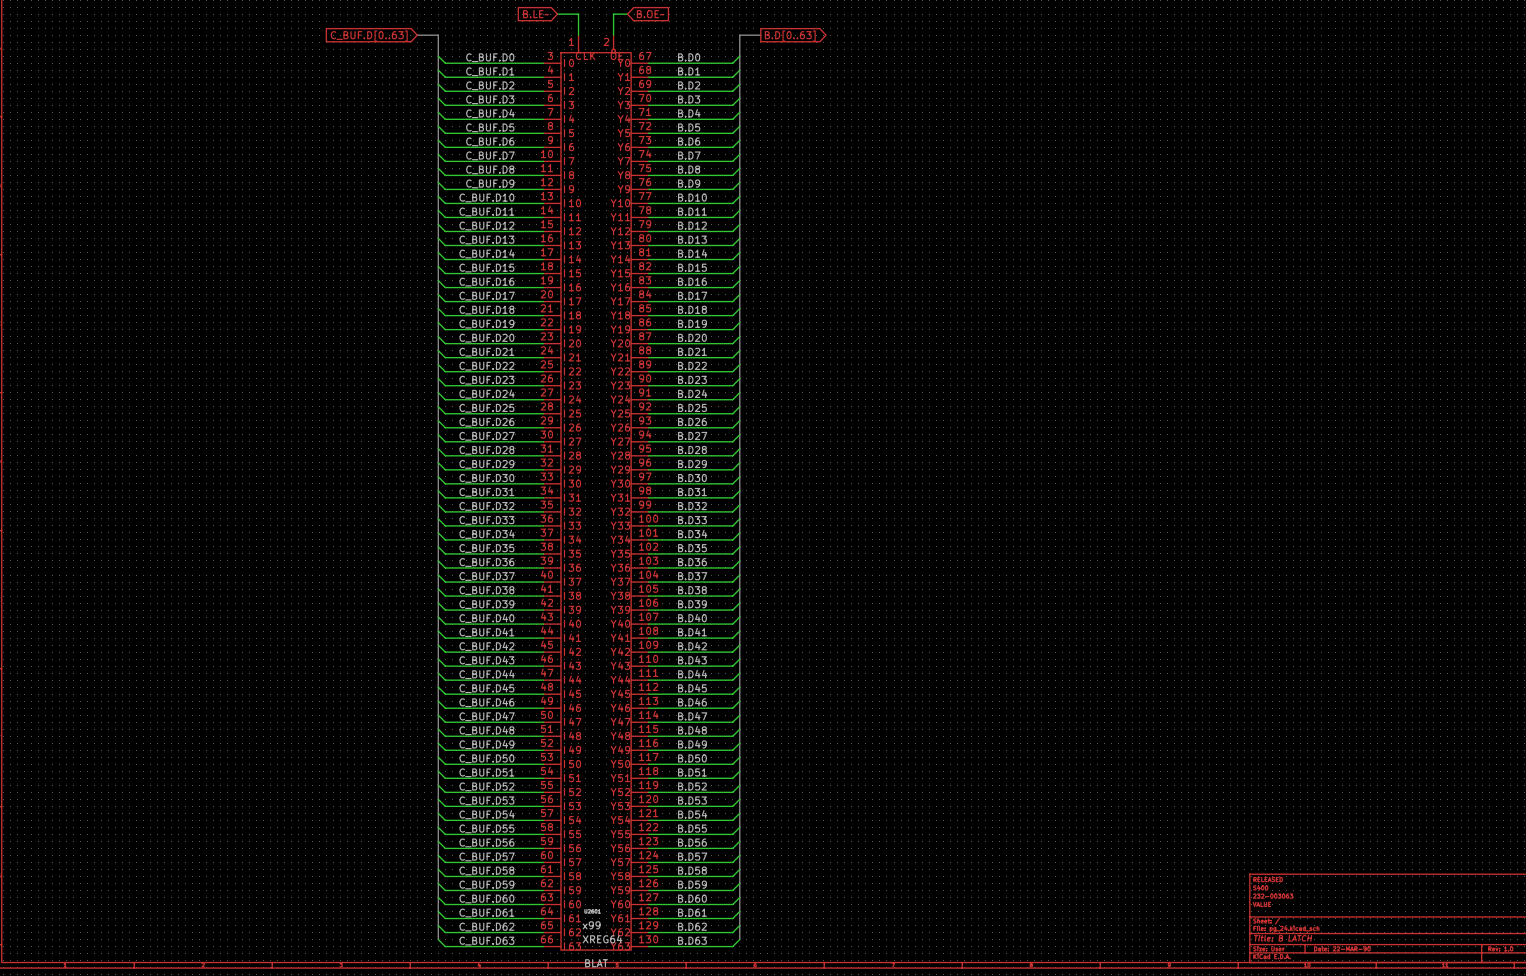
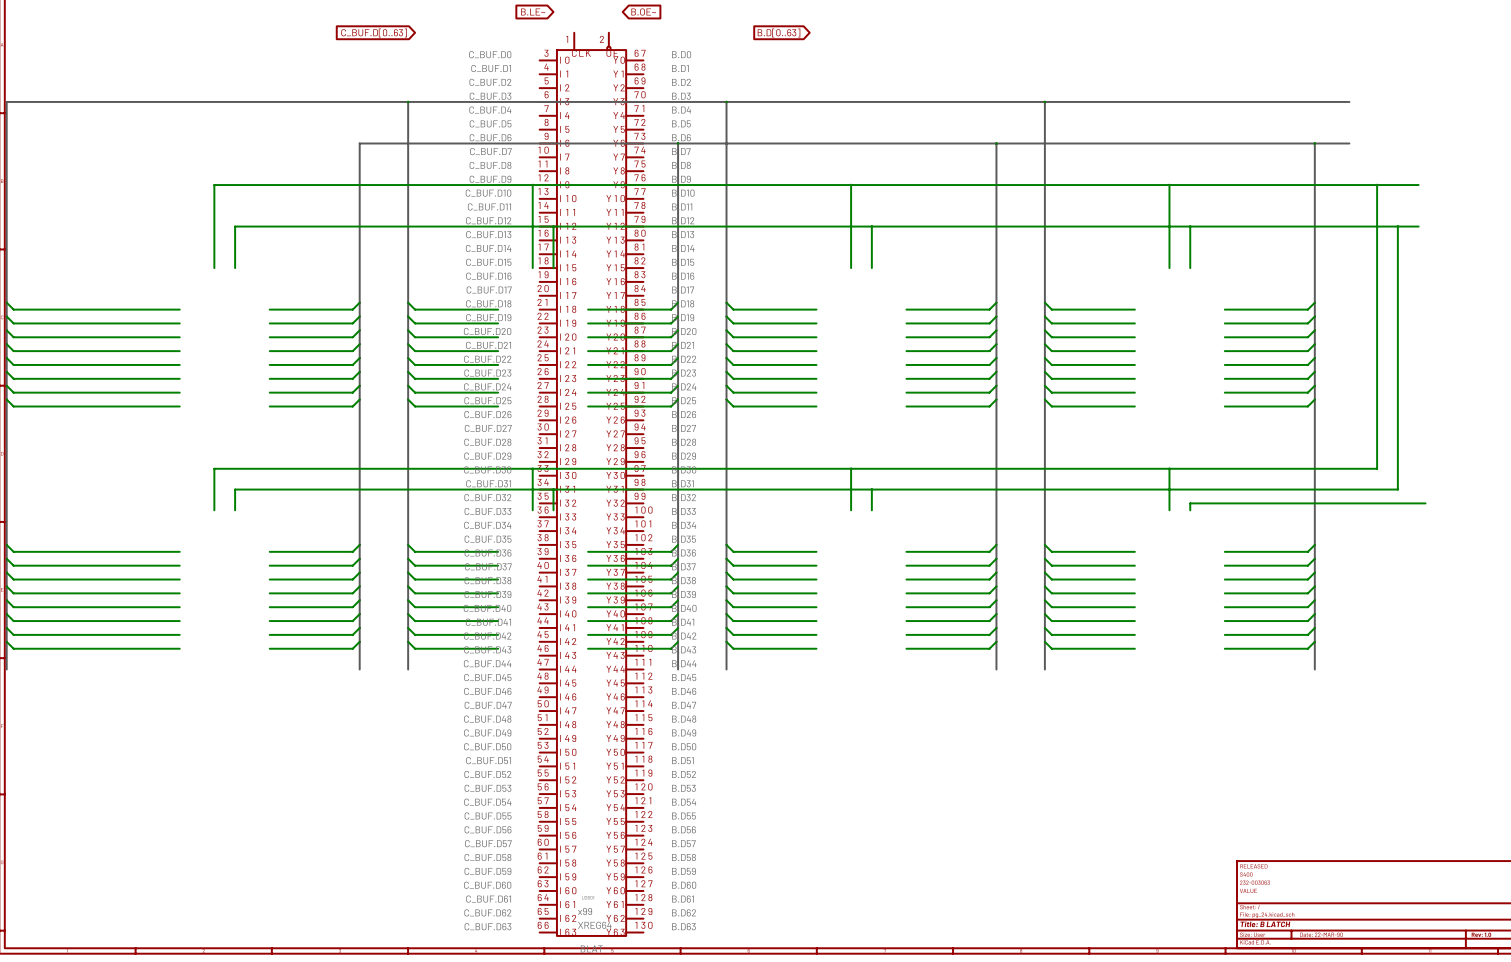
wire: (557, 14) (578, 14) (578, 35) -> none
wire: (627, 14) (613, 14) (613, 35) -> none
bus: (417, 35) (438, 35) (438, 939) -> none
bus: (760, 35) (739, 35) (739, 939) -> none
wire: (438, 56) (445, 63) (543, 63) -> none
wire: (739, 56) (732, 63) (648, 63) -> none
wire: (438, 70) (445, 77) (543, 77) -> none
wire: (739, 70) (732, 77) (648, 77) -> none
wire: (438, 84) (445, 91) (543, 91) -> none
wire: (739, 84) (732, 91) (648, 91) -> none
bus: none -> (408, 101) (408, 669)
junction: none -> (408, 101)
bus: none -> (726, 101) (726, 669)
junction: none -> (726, 101)
bus: none -> (1044, 101) (1044, 669)
junction: none -> (1044, 101)
bus: none -> (1349, 101) (6, 101) (6, 669)
wire: (438, 112) (445, 119) (543, 119) -> none
wire: (739, 112) (732, 119) (648, 119) -> none
wire: (438, 126) (445, 133) (543, 133) -> none
wire: (739, 126) (732, 133) (648, 133) -> none
bus: none -> (678, 143) (678, 669)
junction: none -> (678, 143)
bus: none -> (996, 143) (996, 669)
junction: none -> (996, 143)
bus: none -> (1314, 143) (1314, 669)
junction: none -> (1314, 143)
bus: none -> (1349, 143) (359, 143) (359, 669)
wire: (438, 154) (445, 161) (543, 161) -> none
wire: (739, 154) (732, 161) (648, 161) -> none
wire: (438, 168) (445, 175) (543, 175) -> none
wire: (739, 168) (732, 175) (648, 175) -> none
wire: (438, 182) (445, 189) -> (214, 268) (214, 185) (442, 185)
wire: (739, 182) (732, 189) -> (1418, 185) (726, 185)
wire: none -> (532, 185) (532, 268)
wire: none -> (539, 185) (643, 185)
wire: none -> (851, 185) (851, 268)
wire: none -> (1169, 185) (1169, 268)
wire: none -> (1377, 185) (1377, 468) (214, 468) (214, 510)
wire: (438, 196) (445, 203) (543, 203) -> none
wire: (739, 196) (732, 203) (648, 203) -> none
wire: (438, 210) (445, 217) (543, 217) -> none
wire: (739, 210) (732, 217) (648, 217) -> none
wire: (438, 224) (445, 231) -> (235, 268) (235, 226) (442, 226)
wire: (739, 224) (732, 231) -> (1418, 226) (726, 226)
wire: none -> (539, 226) (643, 226)
wire: none -> (553, 226) (553, 268)
wire: none -> (871, 226) (871, 268)
wire: none -> (1190, 226) (1190, 268)
wire: (438, 238) (445, 245) (543, 245) -> none
wire: (739, 238) (732, 245) (648, 245) -> none
wire: (438, 252) (445, 259) (543, 259) -> none
wire: (739, 252) (732, 259) (648, 259) -> none
wire: (438, 266) (445, 273) (543, 273) -> none
wire: (739, 266) (732, 273) (648, 273) -> none
wire: (438, 280) (445, 287) (543, 287) -> none
wire: (739, 280) (732, 287) (648, 287) -> none
wire: (438, 294) (445, 301) (543, 301) -> none
wire: (739, 294) (732, 301) (648, 301) -> none
wire: none -> (6, 302) (13, 309) (179, 309)
wire: none -> (359, 302) (352, 309) (269, 309)
wire: (438, 308) (445, 315) -> (408, 302) (415, 309) (442, 309)
wire: none -> (726, 302) (733, 309) (816, 309)
wire: (739, 308) (732, 315) (676, 315) -> (678, 302) (671, 309)
wire: none -> (996, 302) (989, 309) (906, 309)
wire: none -> (1044, 302) (1051, 309) (1134, 309)
wire: none -> (1314, 302) (1307, 309) (1224, 309)
wire: (501, 315) (543, 315) -> none
wire: none -> (588, 309) (643, 309)
wire: none -> (6, 316) (13, 323) (179, 323)
wire: none -> (359, 316) (352, 323) (269, 323)
wire: (438, 322) (445, 329) -> (408, 316) (415, 323) (442, 323)
wire: none -> (726, 316) (733, 323) (816, 323)
wire: (739, 322) (732, 329) (676, 329) -> (678, 316) (671, 323)
wire: none -> (996, 316) (989, 323) (906, 323)
wire: none -> (1044, 316) (1051, 323) (1134, 323)
wire: none -> (1314, 316) (1307, 323) (1224, 323)
wire: (501, 329) (543, 329) -> none
wire: none -> (588, 323) (643, 323)
wire: none -> (6, 330) (13, 337) (179, 337)
wire: none -> (359, 330) (352, 337) (269, 337)
wire: (438, 336) (445, 343) -> (408, 330) (415, 337) (442, 337)
wire: none -> (726, 330) (733, 337) (816, 337)
wire: (739, 336) (732, 343) (676, 343) -> (678, 330) (671, 337)
wire: none -> (996, 330) (989, 337) (906, 337)
wire: none -> (1044, 330) (1051, 337) (1134, 337)
wire: none -> (1314, 330) (1307, 337) (1224, 337)
wire: (501, 343) (543, 343) -> none
wire: none -> (588, 337) (643, 337)
wire: none -> (6, 344) (13, 351) (179, 351)
wire: none -> (359, 344) (352, 351) (269, 351)
wire: (438, 350) (445, 357) -> (408, 344) (415, 351) (442, 351)
wire: none -> (726, 344) (733, 351) (816, 351)
wire: (739, 350) (732, 357) (676, 357) -> (678, 344) (671, 351)
wire: none -> (996, 344) (989, 351) (906, 351)
wire: none -> (1044, 344) (1051, 351) (1134, 351)
wire: none -> (1314, 344) (1307, 351) (1224, 351)
wire: (501, 357) (543, 357) -> none
wire: none -> (588, 351) (643, 351)
wire: none -> (6, 358) (13, 364) (179, 364)
wire: none -> (359, 358) (352, 364) (269, 364)
wire: (438, 364) (445, 371) -> (408, 358) (415, 364) (442, 364)
wire: none -> (726, 358) (733, 364) (816, 364)
wire: (739, 364) (732, 371) (676, 371) -> (678, 358) (671, 364)
wire: none -> (996, 358) (989, 364) (906, 364)
wire: none -> (1044, 358) (1051, 364) (1134, 364)
wire: none -> (1314, 358) (1307, 364) (1224, 364)
wire: (501, 371) (543, 371) -> none
wire: none -> (588, 364) (643, 364)
wire: none -> (6, 371) (13, 378) (179, 378)
wire: none -> (359, 371) (352, 378) (269, 378)
wire: (438, 378) (445, 385) -> (408, 371) (415, 378) (442, 378)
wire: none -> (726, 371) (733, 378) (816, 378)
wire: (739, 378) (732, 385) (676, 385) -> (678, 371) (671, 378)
wire: none -> (996, 371) (989, 378) (906, 378)
wire: none -> (1044, 371) (1051, 378) (1134, 378)
wire: none -> (1314, 371) (1307, 378) (1224, 378)
wire: (501, 385) (543, 385) -> none
wire: none -> (588, 378) (643, 378)
wire: none -> (6, 385) (13, 392) (179, 392)
wire: none -> (359, 385) (352, 392) (269, 392)
wire: (438, 392) (445, 399) -> (408, 385) (415, 392) (442, 392)
wire: none -> (726, 385) (733, 392) (816, 392)
wire: (739, 392) (732, 399) (676, 399) -> (678, 385) (671, 392)
wire: none -> (996, 385) (989, 392) (906, 392)
wire: none -> (1044, 385) (1051, 392) (1134, 392)
wire: none -> (1314, 385) (1307, 392) (1224, 392)
wire: (501, 399) (543, 399) -> none
wire: none -> (588, 392) (643, 392)
wire: none -> (6, 399) (13, 406) (179, 406)
wire: none -> (359, 399) (352, 406) (269, 406)
wire: (438, 406) (445, 413) -> (408, 399) (415, 406) (442, 406)
wire: none -> (726, 399) (733, 406) (816, 406)
wire: (739, 406) (732, 413) (676, 413) -> (678, 399) (671, 406)
wire: none -> (996, 399) (989, 406) (906, 406)
wire: none -> (1044, 399) (1051, 406) (1134, 406)
wire: none -> (1314, 399) (1307, 406) (1224, 406)
wire: (501, 413) (543, 413) -> none
wire: none -> (588, 406) (643, 406)
wire: (438, 420) (445, 427) (543, 427) -> none
wire: (739, 420) (732, 427) (648, 427) -> none
wire: (438, 434) (445, 441) (543, 441) -> none
wire: (739, 434) (732, 441) (648, 441) -> none
wire: (438, 448) (445, 455) (543, 455) -> none
wire: (739, 448) (732, 455) (648, 455) -> none
wire: (438, 462) (445, 469) (543, 469) -> none
wire: (739, 462) (732, 469) (648, 469) -> none
wire: (438, 476) (445, 483) (543, 483) -> none
wire: none -> (532, 468) (532, 510)
wire: (739, 476) (732, 483) (648, 483) -> none
wire: none -> (851, 468) (851, 510)
wire: none -> (1169, 468) (1169, 510)
wire: (438, 490) (445, 497) -> (235, 510) (235, 489) (442, 489)
wire: (739, 490) (732, 497) -> (1397, 226) (1397, 489) (726, 489)
wire: none -> (539, 489) (643, 489)
wire: none -> (553, 489) (553, 510)
wire: none -> (871, 489) (871, 510)
wire: (438, 504) (445, 511) (543, 511) -> none
wire: (739, 504) (732, 511) (648, 511) -> none
wire: none -> (1425, 503) (1190, 503) (1190, 510)
wire: (438, 518) (445, 525) (543, 525) -> none
wire: (739, 518) (732, 525) (648, 525) -> none
wire: (438, 532) (445, 539) (543, 539) -> none
wire: (739, 532) (732, 539) (648, 539) -> none
wire: (438, 546) (445, 553) (543, 553) -> none
wire: (739, 546) (732, 553) (648, 553) -> (678, 544) (671, 551) (588, 551)
wire: none -> (6, 544) (13, 551) (179, 551)
wire: none -> (359, 544) (352, 551) (269, 551)
wire: none -> (408, 544) (415, 551) (498, 551)
wire: none -> (726, 544) (733, 551) (816, 551)
wire: none -> (996, 544) (989, 551) (906, 551)
wire: none -> (1044, 544) (1051, 551) (1134, 551)
wire: none -> (1314, 544) (1307, 551) (1224, 551)
wire: (438, 560) (445, 567) (543, 567) -> none
wire: (739, 560) (732, 567) (648, 567) -> (678, 558) (671, 565) (588, 565)
wire: none -> (6, 558) (13, 565) (179, 565)
wire: none -> (359, 558) (352, 565) (269, 565)
wire: none -> (408, 558) (415, 565) (498, 565)
wire: none -> (726, 558) (733, 565) (816, 565)
wire: none -> (996, 558) (989, 565) (906, 565)
wire: none -> (1044, 558) (1051, 565) (1134, 565)
wire: none -> (1314, 558) (1307, 565) (1224, 565)
wire: (438, 575) (445, 582) (543, 582) -> none
wire: (739, 575) (732, 582) (648, 582) -> (678, 572) (671, 579) (588, 579)
wire: none -> (6, 572) (13, 579) (179, 579)
wire: none -> (359, 572) (352, 579) (269, 579)
wire: none -> (408, 572) (415, 579) (498, 579)
wire: none -> (726, 572) (733, 579) (816, 579)
wire: none -> (996, 572) (989, 579) (906, 579)
wire: none -> (1044, 572) (1051, 579) (1134, 579)
wire: none -> (1314, 572) (1307, 579) (1224, 579)
wire: (438, 589) (445, 596) (543, 596) -> none
wire: (739, 589) (732, 596) (648, 596) -> (678, 586) (671, 593) (588, 593)
wire: none -> (6, 586) (13, 593) (179, 593)
wire: none -> (359, 586) (352, 593) (269, 593)
wire: none -> (408, 586) (415, 593) (498, 593)
wire: none -> (726, 586) (733, 593) (816, 593)
wire: none -> (996, 586) (989, 593) (906, 593)
wire: none -> (1044, 586) (1051, 593) (1134, 593)
wire: none -> (1314, 586) (1307, 593) (1224, 593)
wire: (438, 603) (445, 610) (543, 610) -> none
wire: (739, 603) (732, 610) (648, 610) -> (678, 600) (671, 607) (588, 607)
wire: none -> (6, 600) (13, 607) (179, 607)
wire: none -> (359, 600) (352, 607) (269, 607)
wire: none -> (408, 600) (415, 607) (498, 607)
wire: none -> (726, 600) (733, 607) (816, 607)
wire: none -> (996, 600) (989, 607) (906, 607)
wire: none -> (1044, 600) (1051, 607) (1134, 607)
wire: none -> (1314, 600) (1307, 607) (1224, 607)
wire: (438, 617) (445, 624) (543, 624) -> none
wire: (739, 617) (732, 624) (648, 624) -> (678, 614) (671, 621) (588, 621)
wire: none -> (6, 614) (13, 621) (179, 621)
wire: none -> (359, 614) (352, 621) (269, 621)
wire: none -> (408, 614) (415, 621) (498, 621)
wire: none -> (726, 614) (733, 621) (816, 621)
wire: none -> (996, 614) (989, 621) (906, 621)
wire: none -> (1044, 614) (1051, 621) (1134, 621)
wire: none -> (1314, 614) (1307, 621) (1224, 621)
wire: (438, 631) (445, 638) (543, 638) -> none
wire: (739, 631) (732, 638) (648, 638) -> (678, 627) (671, 634) (588, 634)
wire: none -> (6, 627) (13, 634) (179, 634)
wire: none -> (359, 627) (352, 634) (269, 634)
wire: none -> (408, 627) (415, 634) (498, 634)
wire: none -> (726, 627) (733, 634) (816, 634)
wire: none -> (996, 627) (989, 634) (906, 634)
wire: none -> (1044, 627) (1051, 634) (1134, 634)
wire: none -> (1314, 627) (1307, 634) (1224, 634)
wire: (438, 645) (445, 652) (543, 652) -> none
wire: (739, 645) (732, 652) (648, 652) -> (678, 641) (671, 648) (588, 648)
wire: none -> (6, 641) (13, 648) (179, 648)
wire: none -> (359, 641) (352, 648) (269, 648)
wire: none -> (408, 641) (415, 648) (498, 648)
wire: none -> (726, 641) (733, 648) (816, 648)
wire: none -> (996, 641) (989, 648) (906, 648)
wire: none -> (1044, 641) (1051, 648) (1134, 648)
wire: none -> (1314, 641) (1307, 648) (1224, 648)
wire: (438, 659) (445, 666) (543, 666) -> none
wire: (739, 659) (732, 666) (648, 666) -> none
wire: (438, 673) (445, 680) (543, 680) -> none
wire: (739, 673) (732, 680) (648, 680) -> none
wire: (438, 687) (445, 694) (543, 694) -> none
wire: (739, 687) (732, 694) (648, 694) -> none
wire: (438, 701) (445, 708) (543, 708) -> none
wire: (739, 701) (732, 708) (648, 708) -> none
wire: (438, 715) (445, 722) (543, 722) -> none
wire: (739, 715) (732, 722) (648, 722) -> none
wire: (438, 729) (445, 736) (543, 736) -> none
wire: (739, 729) (732, 736) (648, 736) -> none
wire: (438, 743) (445, 750) (543, 750) -> none
wire: (739, 743) (732, 750) (648, 750) -> none
wire: (438, 757) (445, 764) (543, 764) -> none
wire: (739, 757) (732, 764) (648, 764) -> none
wire: (438, 771) (445, 778) (543, 778) -> none
wire: (739, 771) (732, 778) (648, 778) -> none
wire: (438, 785) (445, 792) (543, 792) -> none
wire: (739, 785) (732, 792) (648, 792) -> none
wire: (438, 799) (445, 806) (543, 806) -> none
wire: (739, 799) (732, 806) (648, 806) -> none
wire: (438, 813) (445, 820) (543, 820) -> none
wire: (739, 813) (732, 820) (648, 820) -> none
wire: (438, 827) (445, 834) (543, 834) -> none
wire: (739, 827) (732, 834) (648, 834) -> none
wire: (438, 841) (445, 848) (543, 848) -> none
wire: (739, 841) (732, 848) (648, 848) -> none
wire: (438, 855) (445, 862) (543, 862) -> none
wire: (739, 855) (732, 862) (648, 862) -> none
wire: (438, 869) (445, 876) (543, 876) -> none
wire: (739, 869) (732, 876) (648, 876) -> none
wire: (438, 883) (445, 890) (543, 890) -> none
wire: (739, 883) (732, 890) (648, 890) -> none
wire: (438, 897) (445, 904) (543, 904) -> none
wire: (739, 897) (732, 904) (648, 904) -> none
wire: (438, 911) (445, 918) (543, 918) -> none
wire: (739, 911) (732, 918) (648, 918) -> none
wire: (438, 925) (445, 932) (543, 932) -> none
wire: (739, 925) (732, 932) (648, 932) -> none
wire: (438, 939) (445, 946) (543, 946) -> none
wire: (739, 939) (732, 946) (648, 946) -> none

